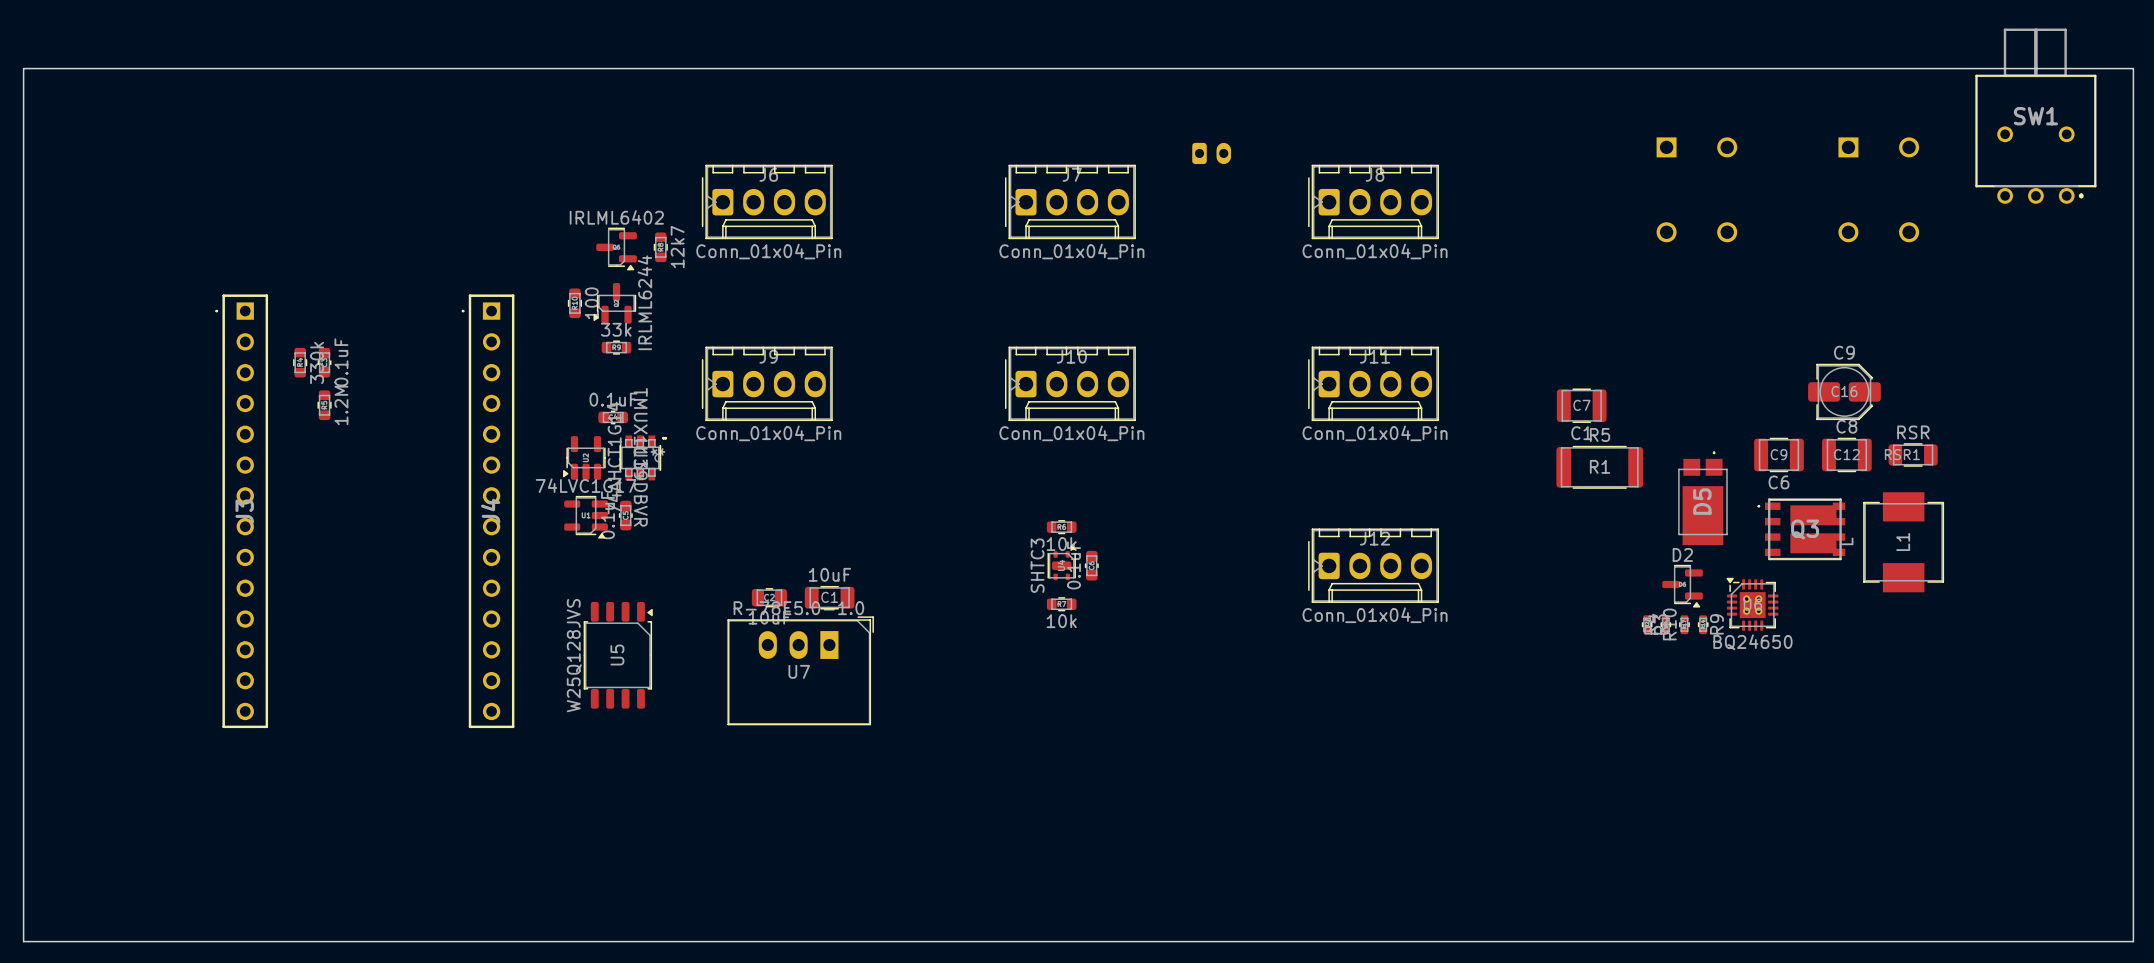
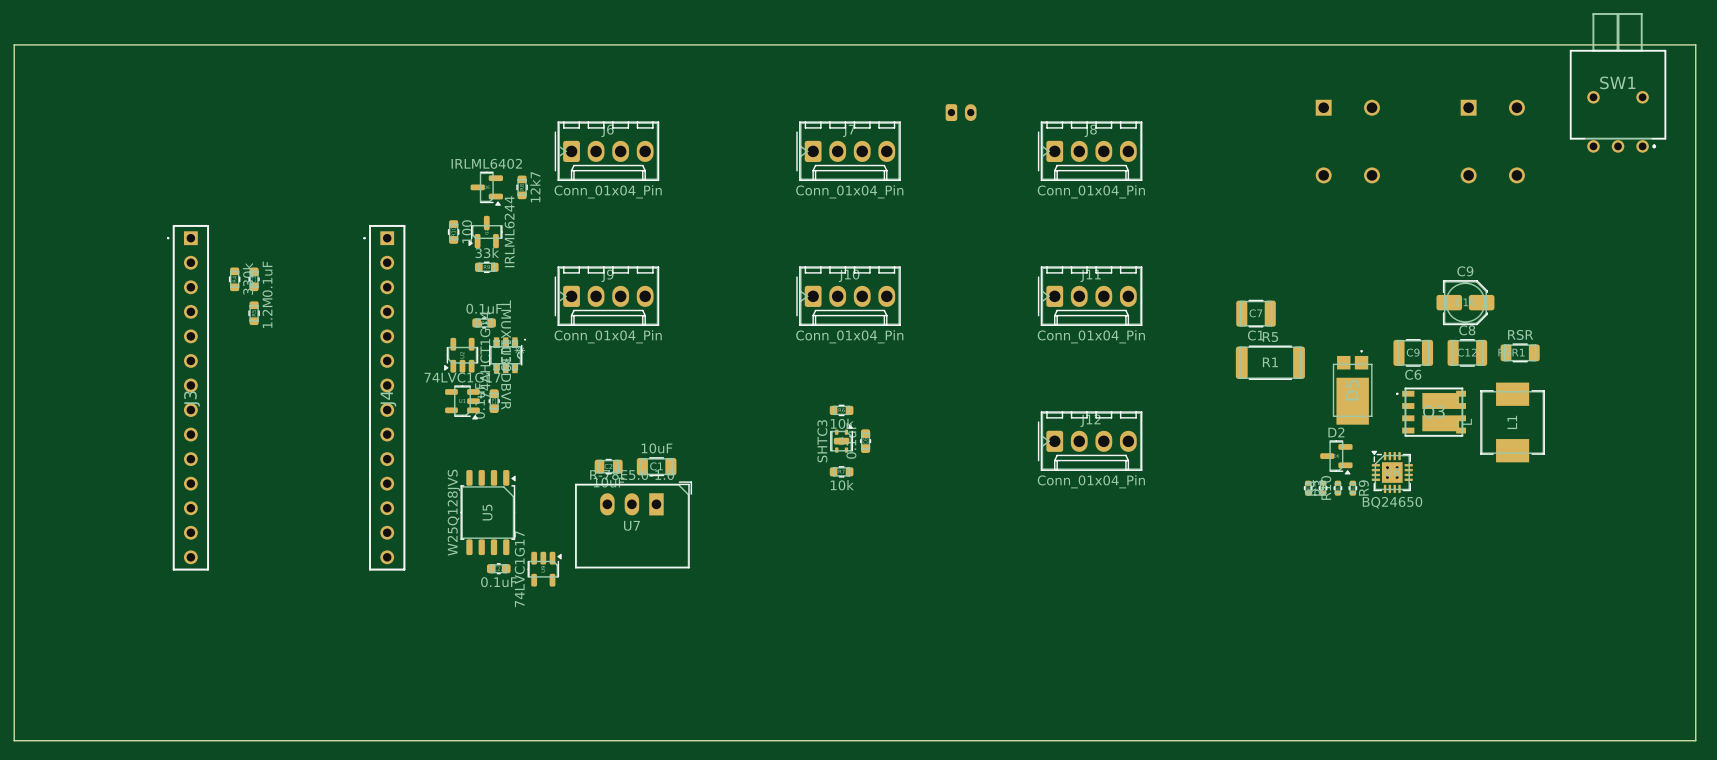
part: none -> 0.1uF (498, 568)
part: none -> 74LVC1G17 (544, 569)

